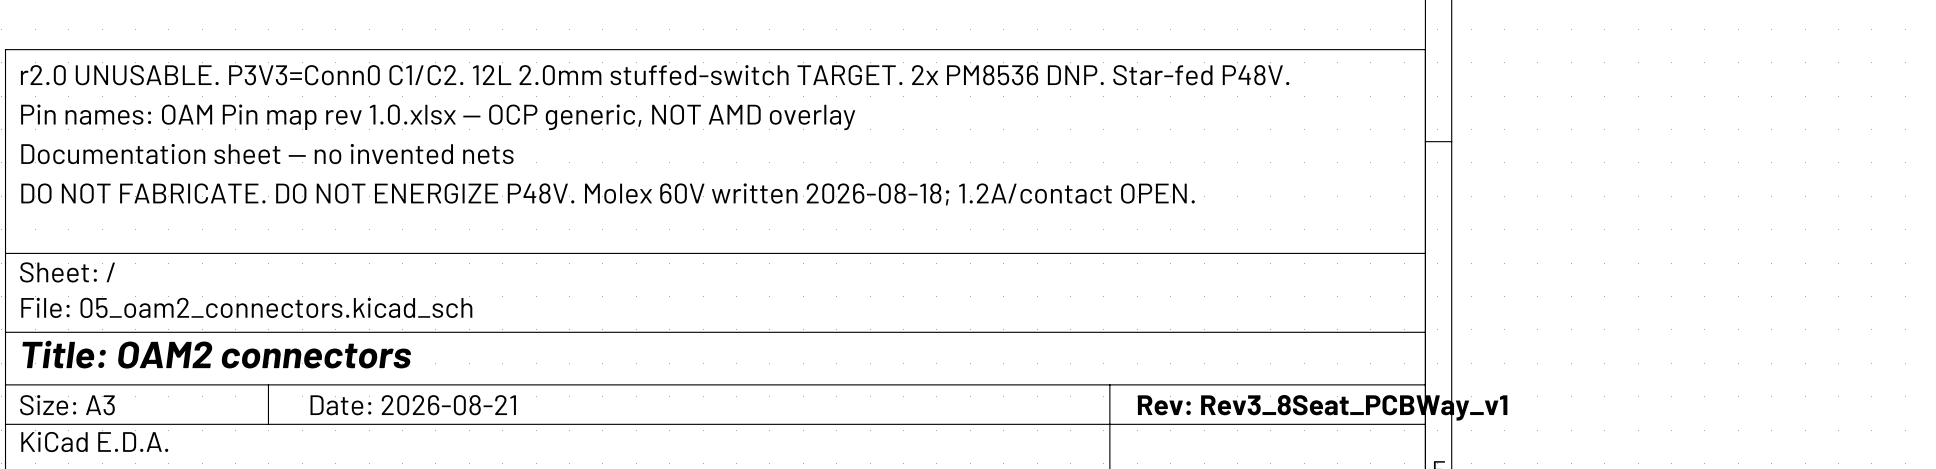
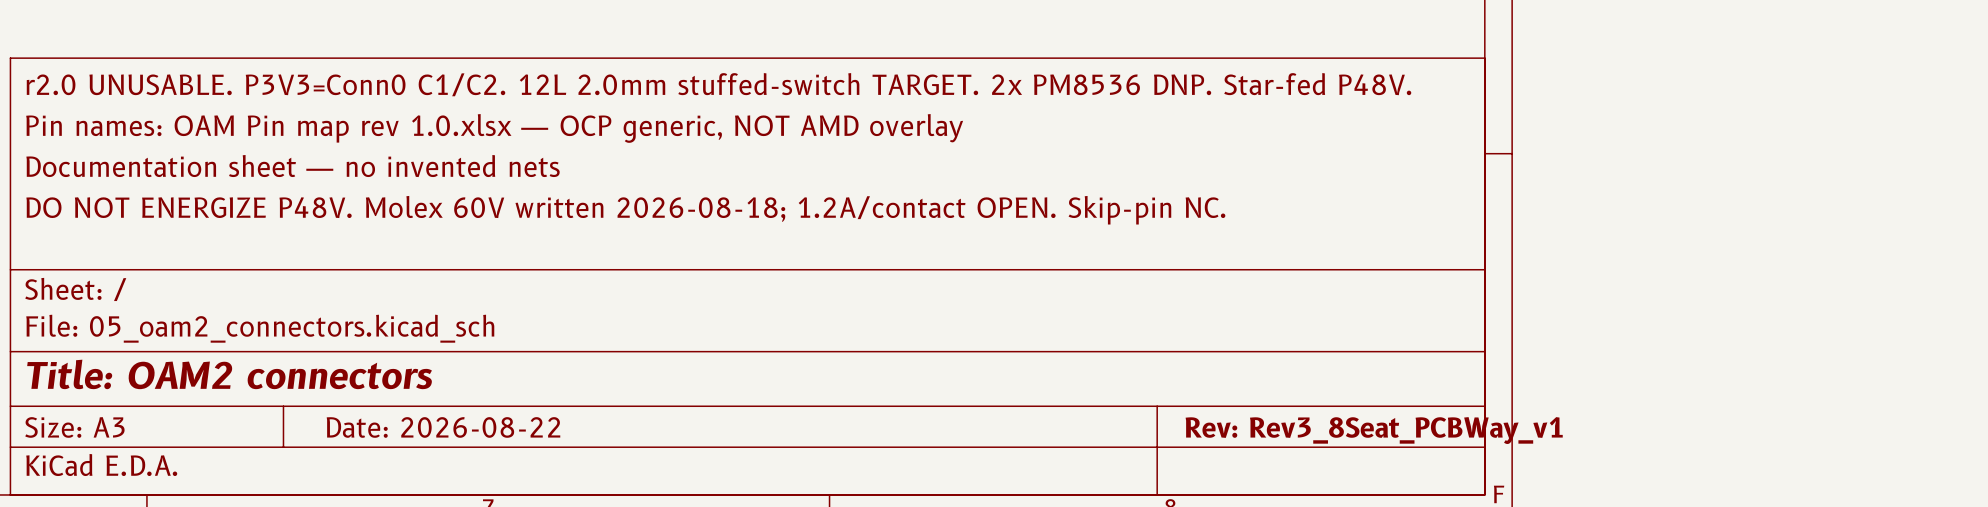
title block: DO NOT FABRICATE. DO NOT ENERGIZE P48V. Molex 60V written 2026-08-18; 1.2A/contact OPEN. (608, 194) -> DO NOT ENERGIZE P48V. Molex 60V written 2026-08-18; 1.2A/contact OPEN. Skip-pin NC. (625, 210)
title block: Date: 2026-08-21 (413, 405) -> Date: 2026-08-22 (443, 427)

